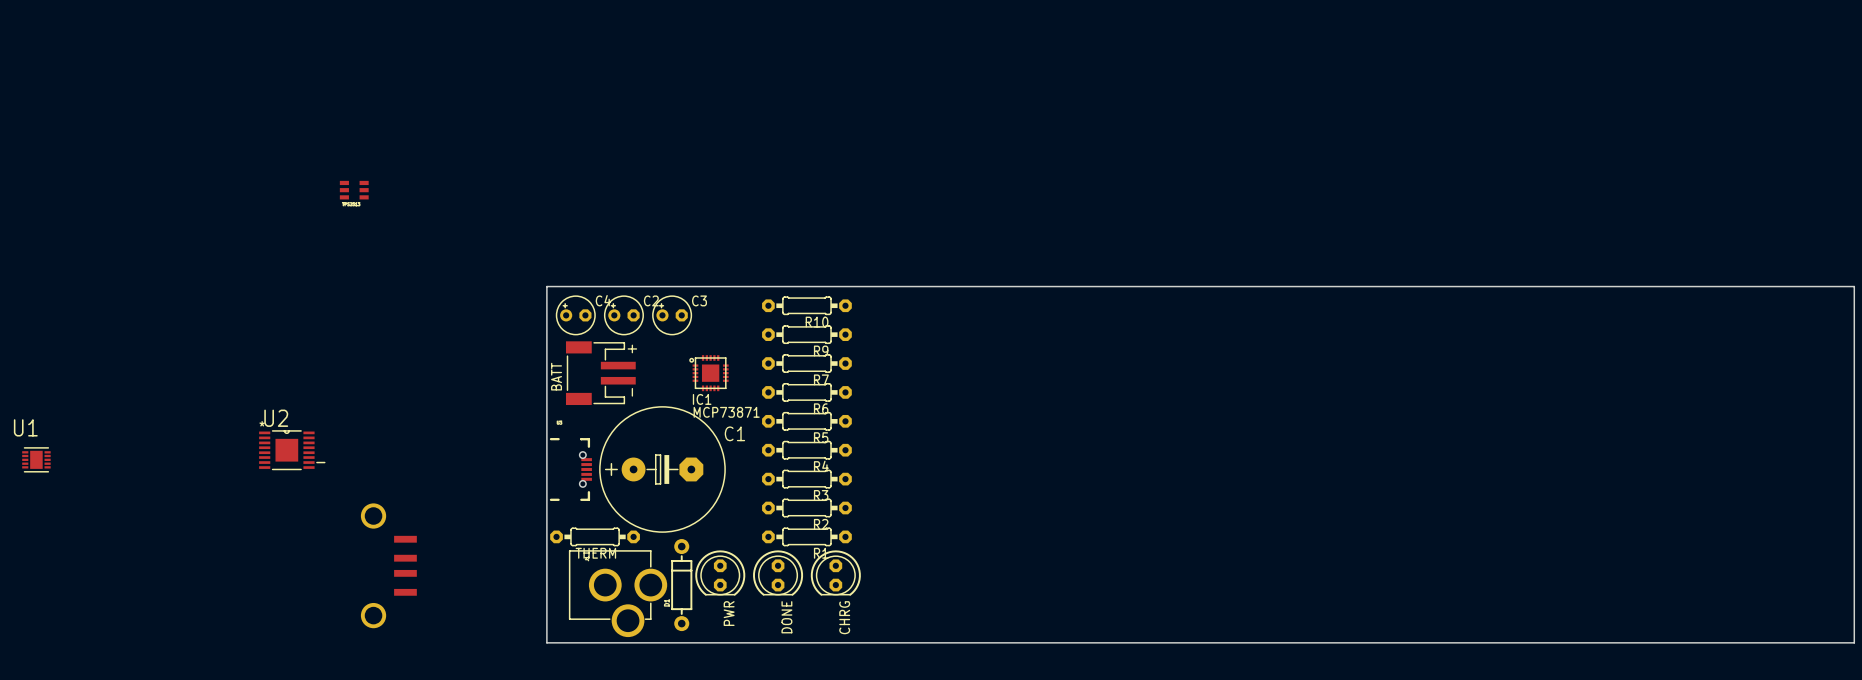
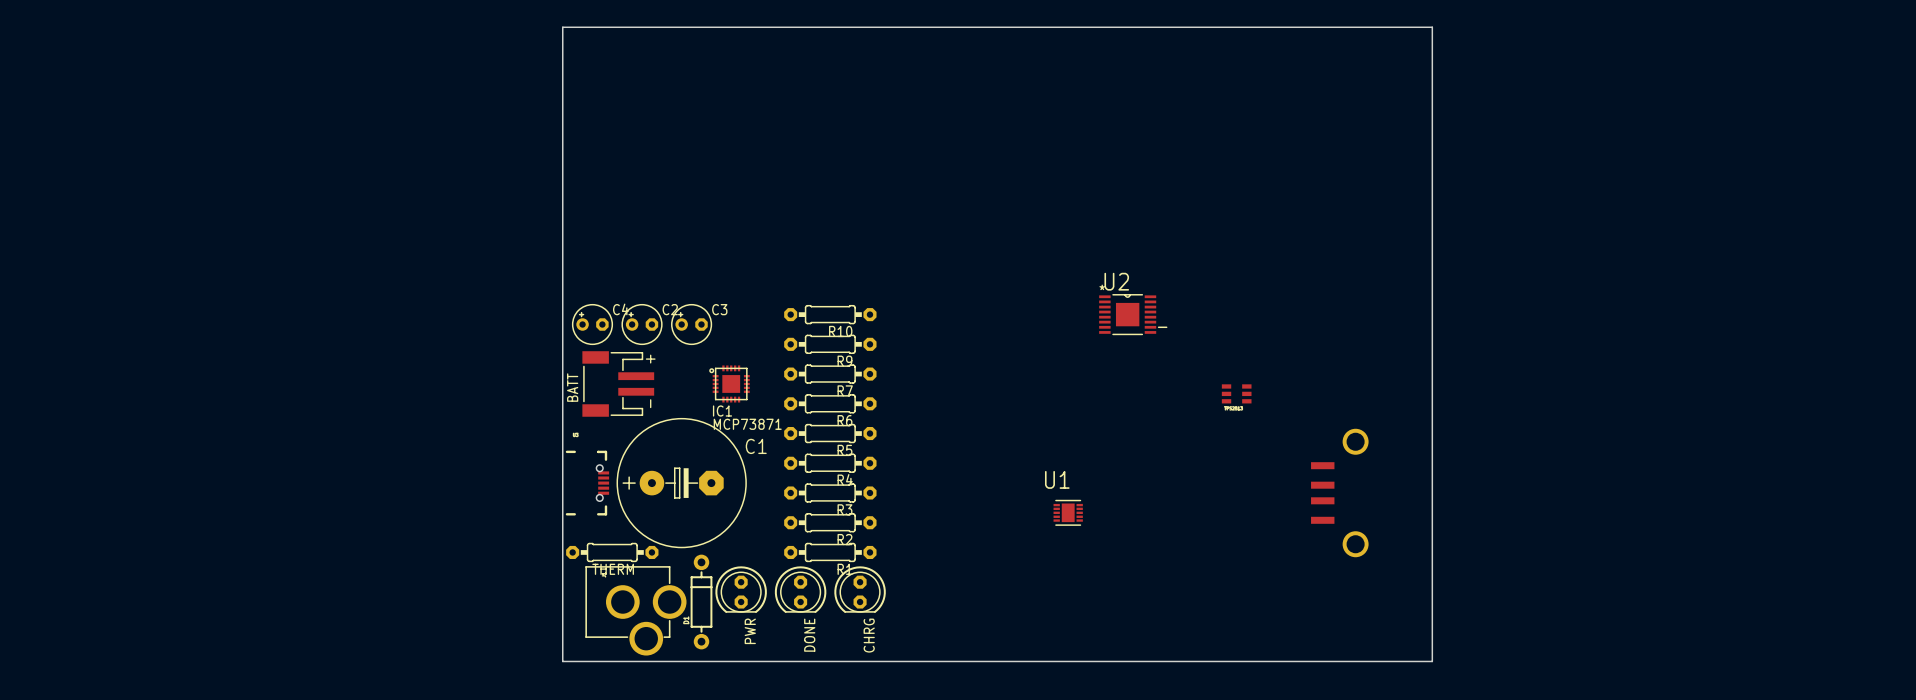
part position: (354, 190) -> (1236, 393)
board edge: (546, 286) (1854, 286) (1854, 642) (1391, 642) -> (562, 294) (562, 27) (1432, 27) (1432, 661)
U2 position: (292, 450) -> (1133, 314)
U1 position: (36, 459) -> (1068, 512)
part: none -> (1339, 493)
part: (388, 565) -> none

